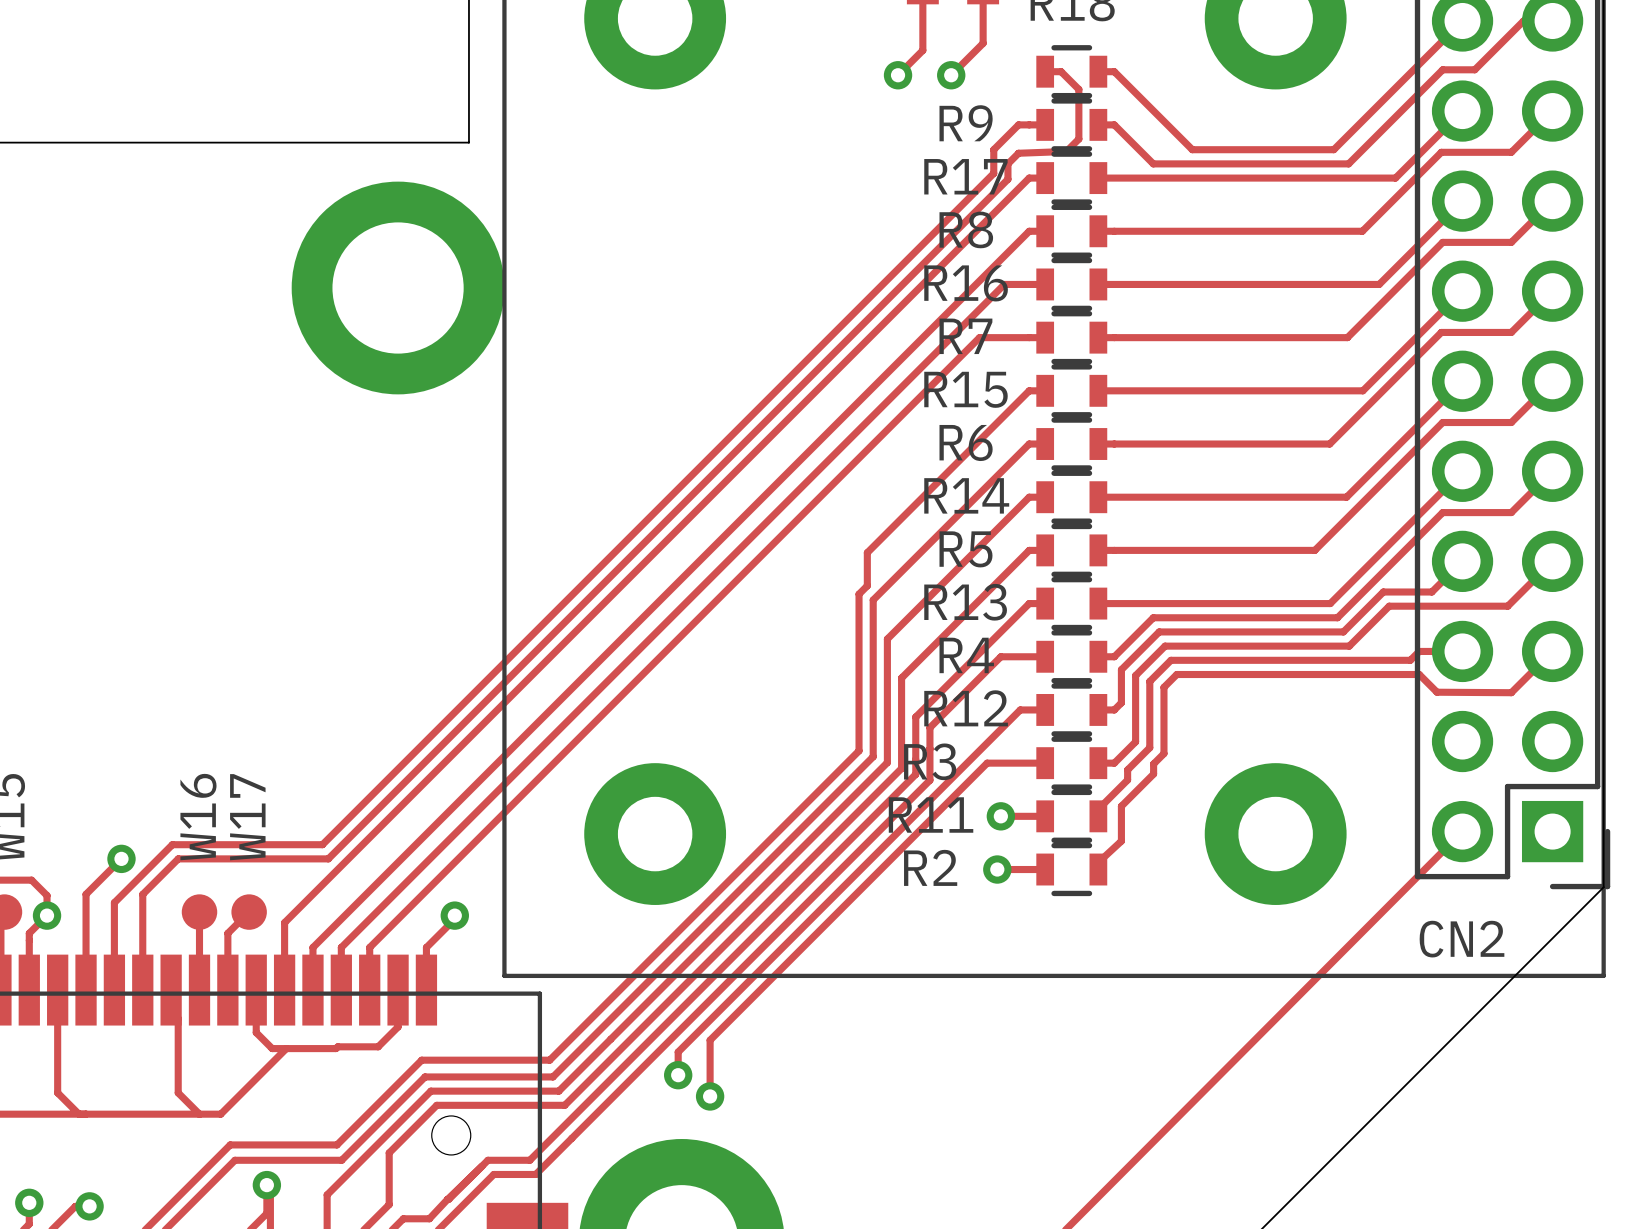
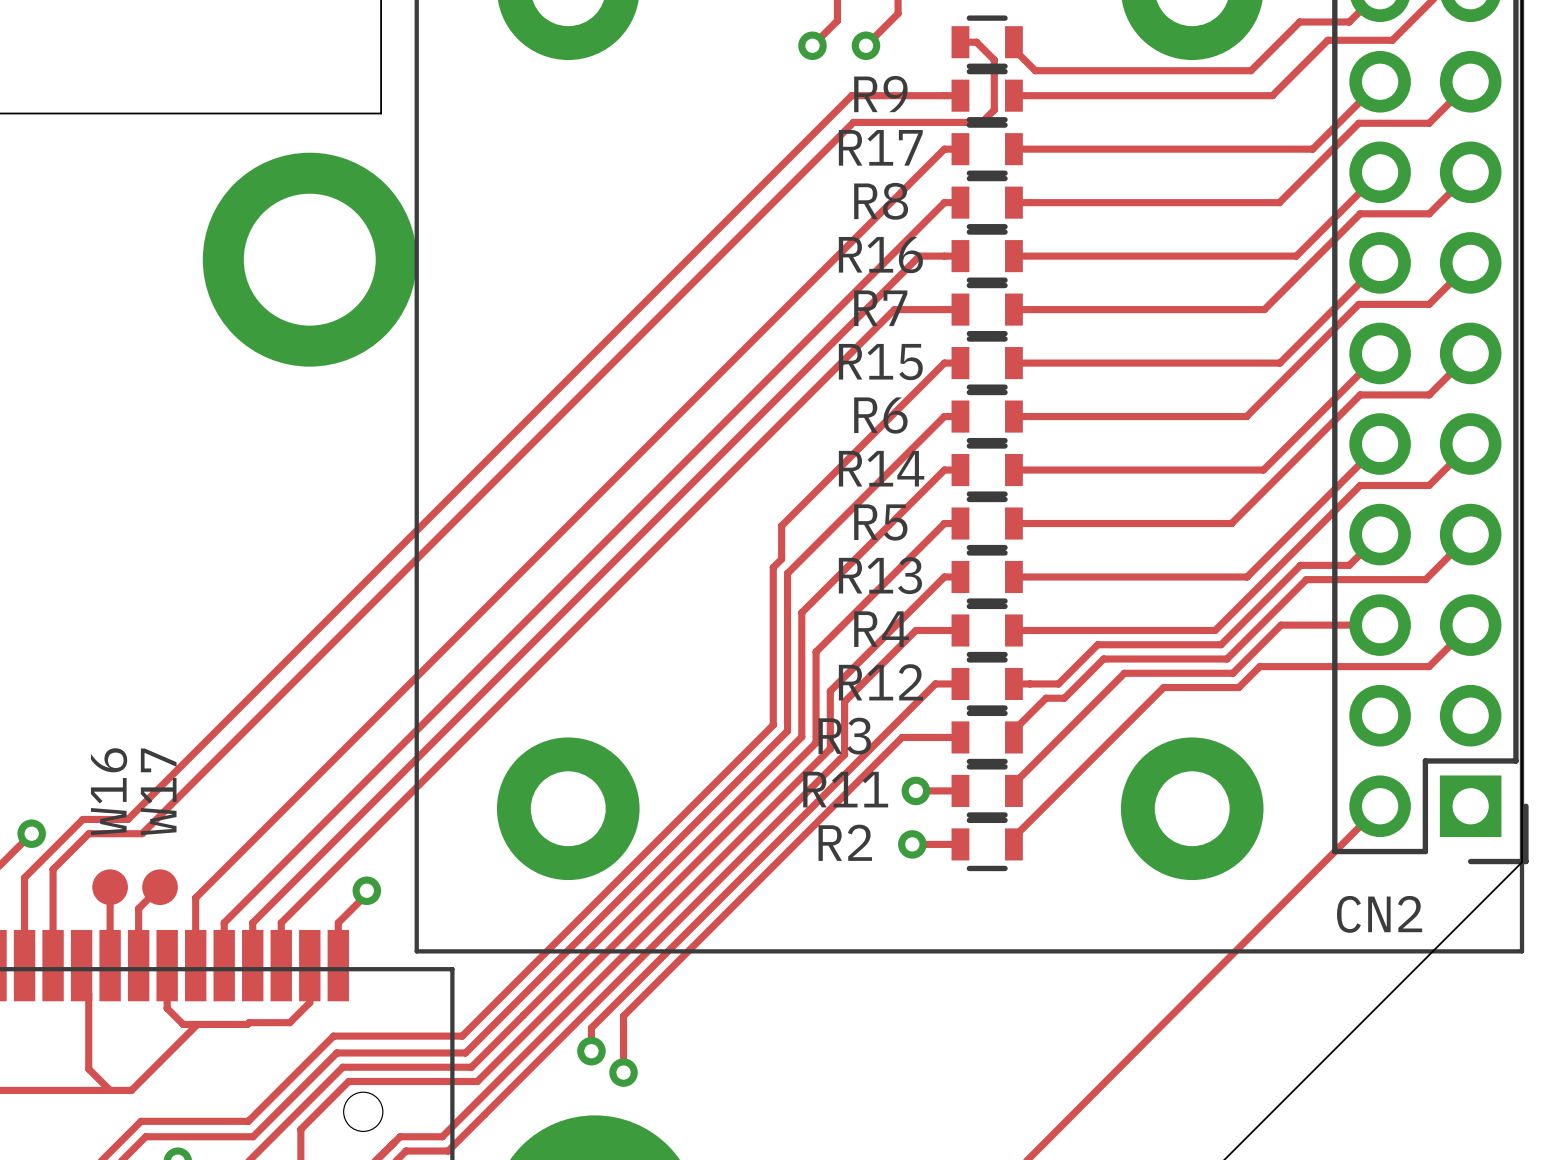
track: (1431, 51) (1333, 149) (1192, 149) (1114, 71) (1098, 71) -> (1349, 22) (1299, 22) (1251, 70) (1035, 70) (1013, 49) (1013, 42)
track: (1442, 69) (1348, 163) (1153, 163) (1114, 124) -> (1360, 40) (1327, 40) (1272, 95) (1029, 95)
track: (1018, 124) (993, 149) (993, 173) (322, 844) (217, 844) -> (933, 95) (851, 95) (127, 819)
track: (1066, 151) (1018, 153) (1007, 163) (1007, 179) (328, 858) (231, 858) -> (981, 122) (853, 122) (142, 833)
track: (1337, 617) (1153, 617) (1114, 656) -> (1254, 591) (1215, 630) (1029, 630)
track: (1343, 631) (1159, 631) (1121, 669) (1121, 702) (1114, 709) -> (1260, 605) (1221, 644) (1097, 644) (1058, 683) (1029, 683)
track: (1349, 646) (1165, 646) (1135, 675) (1135, 741) (1114, 763) (1098, 763) -> (1266, 619) (1227, 659) (1103, 659) (1064, 698) (1046, 698) (1013, 730) (1013, 737)
track: (1419, 651) (1410, 660) (1170, 660) (1149, 681) (1149, 747) (1127, 769) (1127, 779) -> (1336, 625) (1281, 625) (1232, 673) (1124, 673) (1043, 754)
track: (1511, 692) (1437, 692) (1419, 674) (1176, 674) (1163, 687) (1163, 753) (1153, 763) (1153, 774) (1121, 806) (1121, 841) (1098, 862) -> (1429, 666) (1259, 666) (1238, 687) (1163, 687) (1013, 837)

